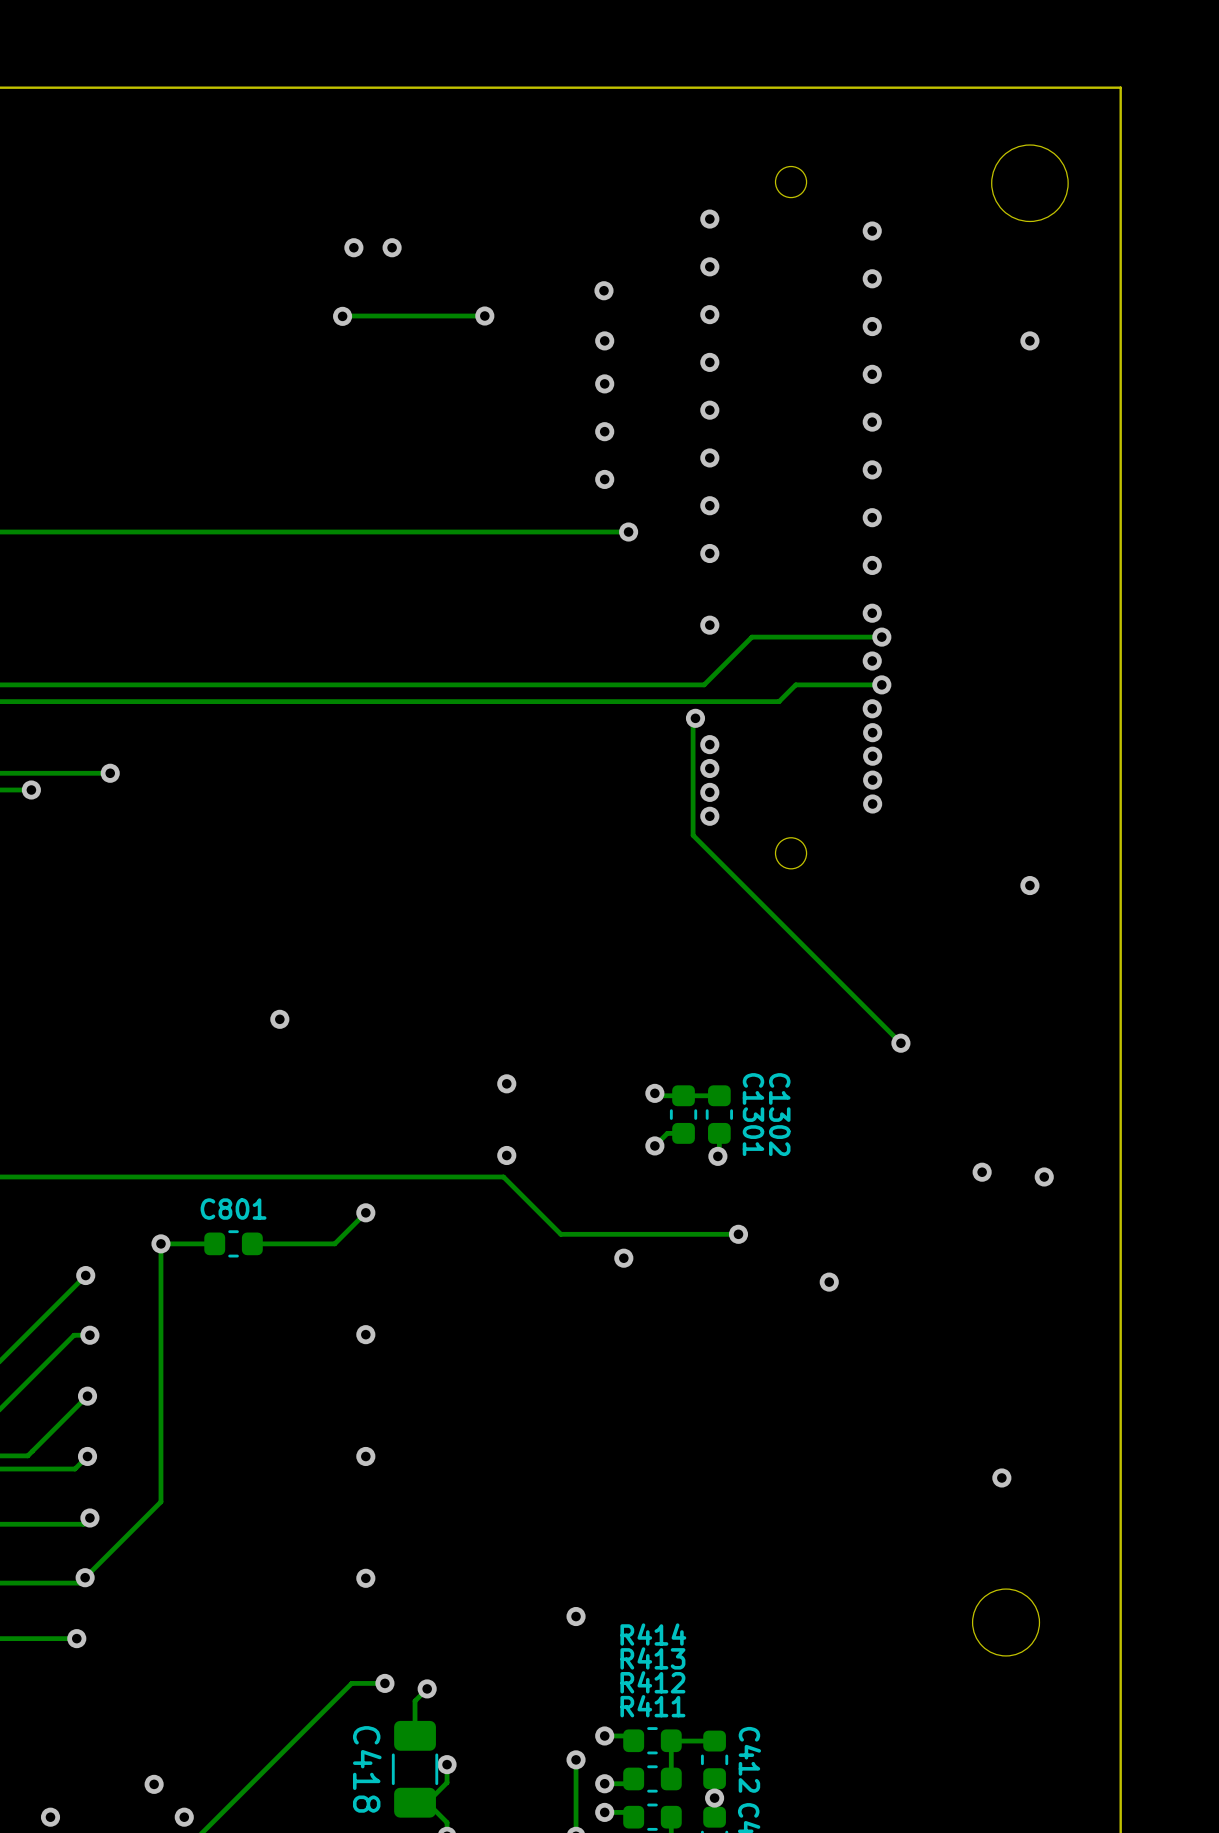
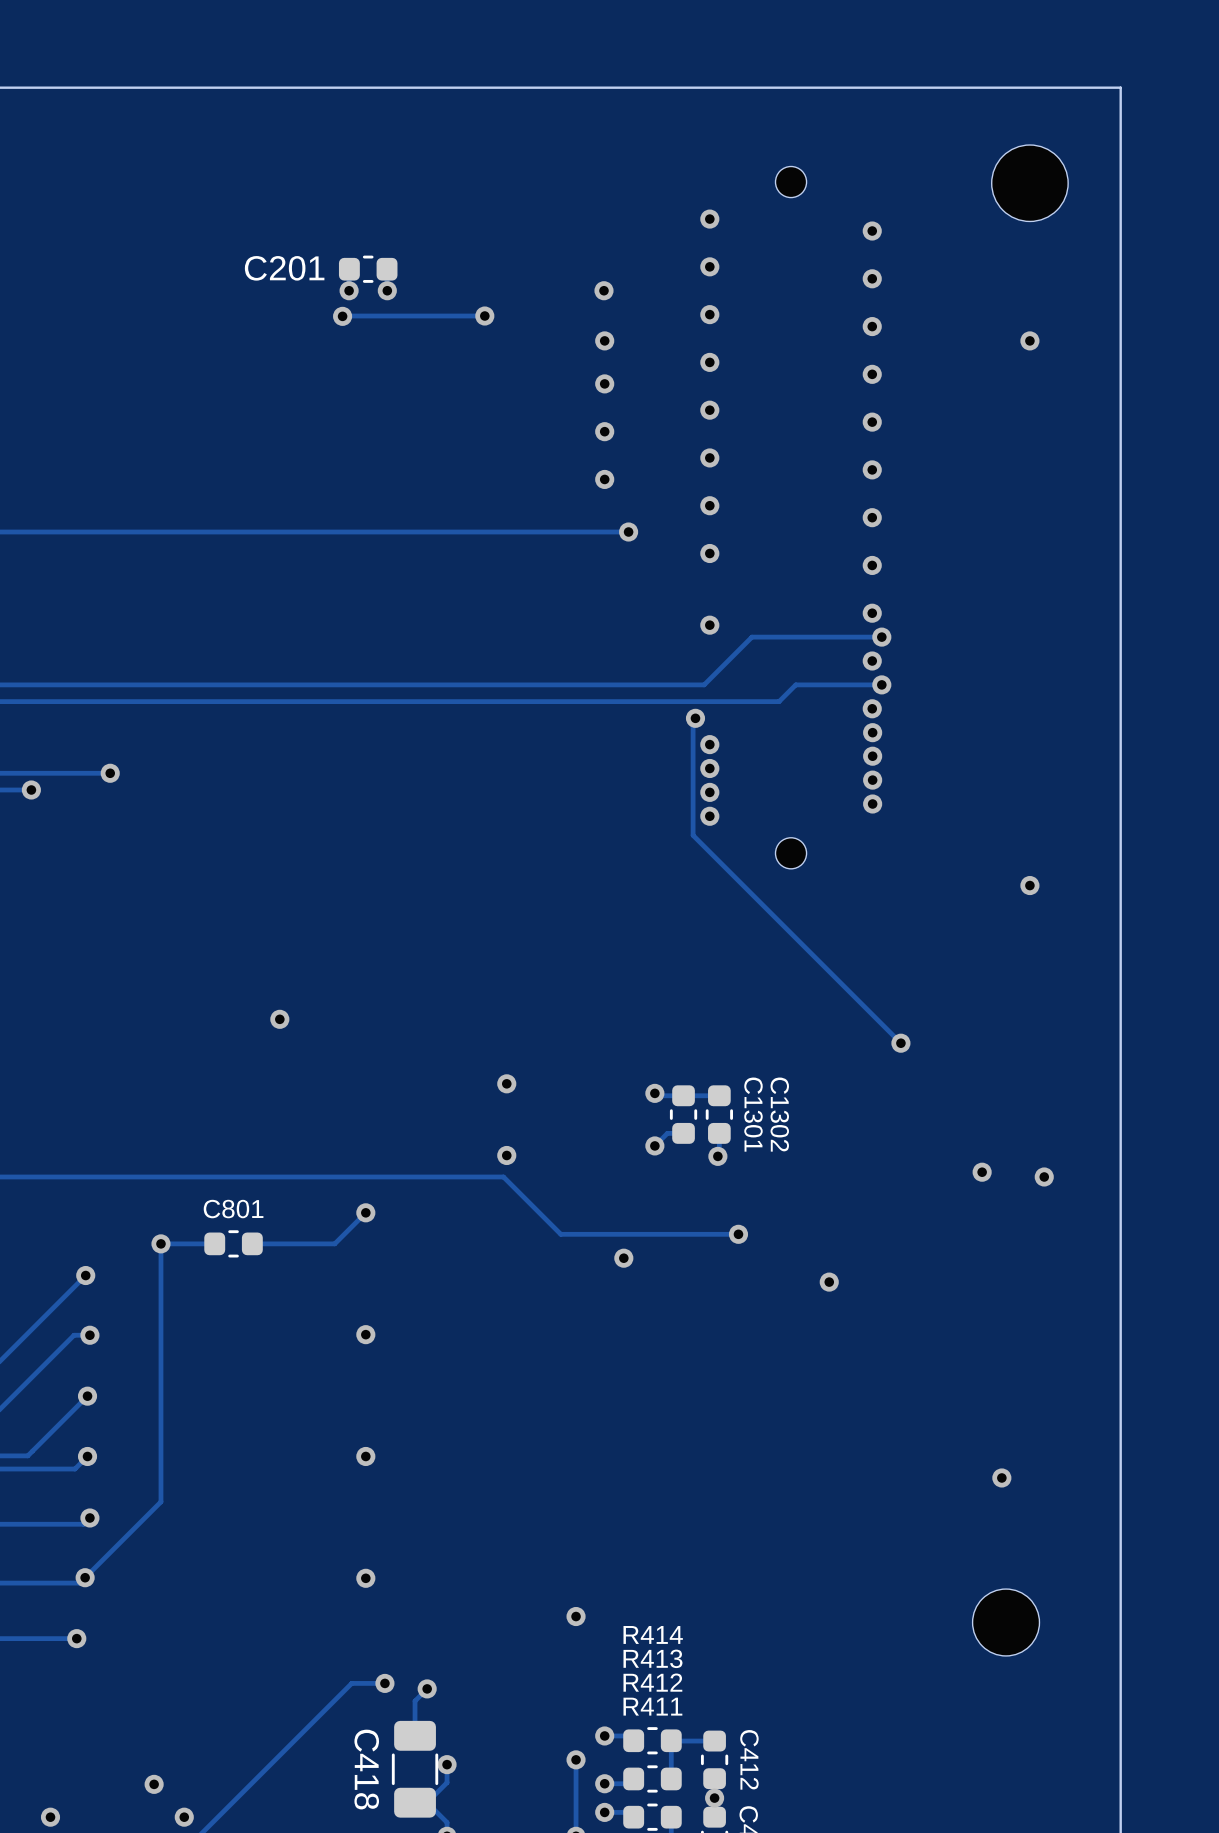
via: (353, 247) -> none
via: (392, 247) -> none
C201: none -> (368, 269)
via: none -> (349, 290)
via: none -> (387, 290)

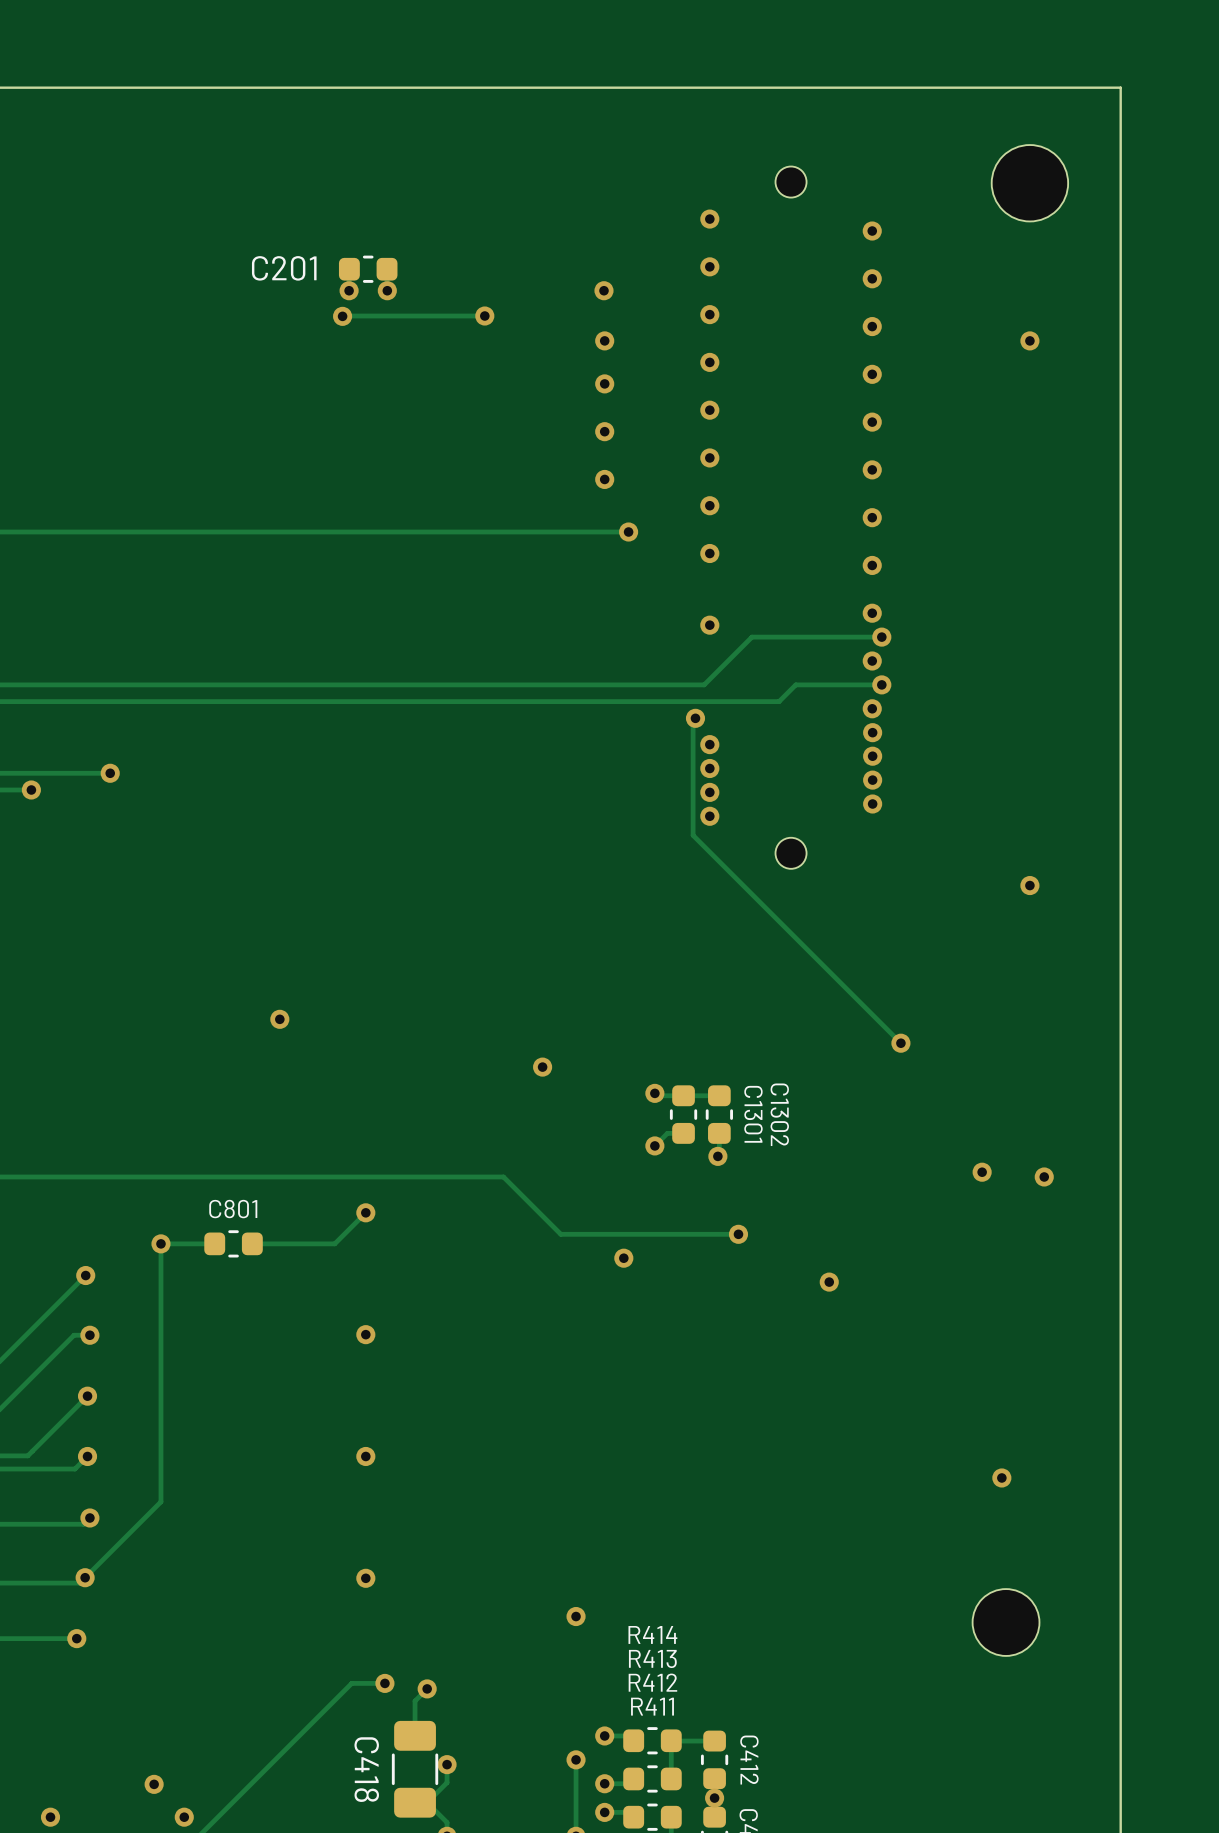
via position: (506, 1083) -> (542, 1067)
via: (506, 1155) -> none

